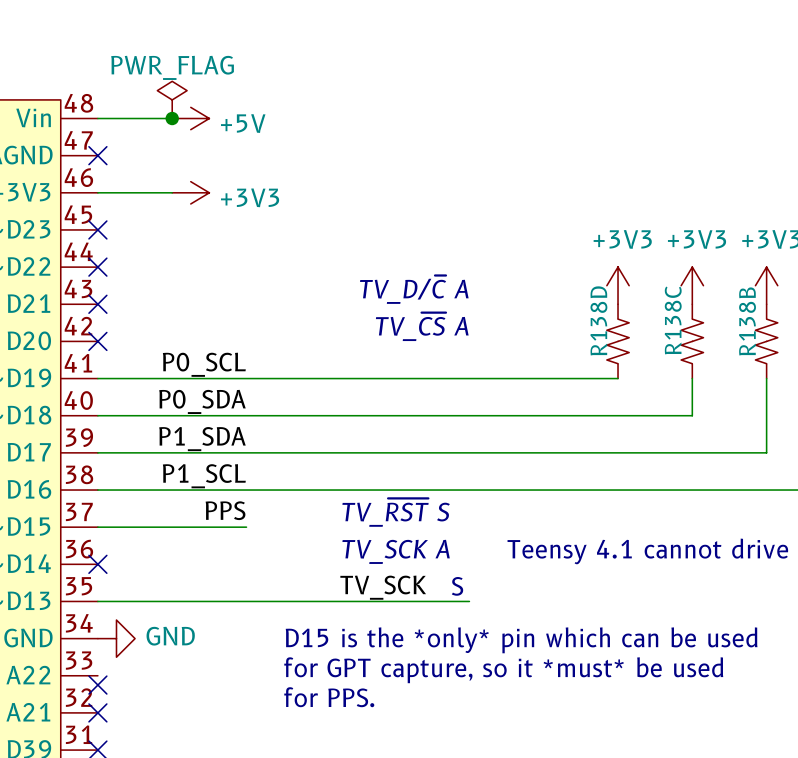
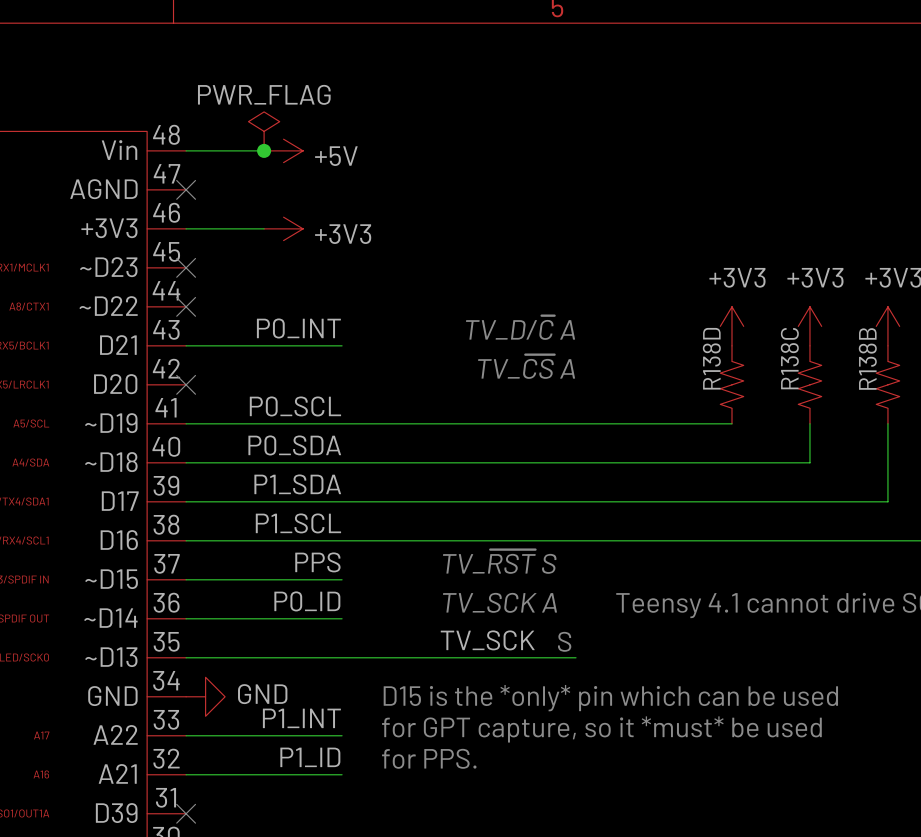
label: none -> P0_INT (298, 328)
wire: none -> (186, 345) (342, 345)
no-connect mark: (97, 304) -> none
label: none -> P0_ID (307, 601)
wire: none -> (186, 618) (342, 618)
no-connect mark: (97, 564) -> none
label: none -> P1_INT (301, 718)
wire: none -> (186, 735) (342, 735)
no-connect mark: (97, 685) -> none
label: none -> P1_ID (310, 757)
wire: none -> (186, 774) (342, 774)
no-connect mark: (97, 712) -> none

